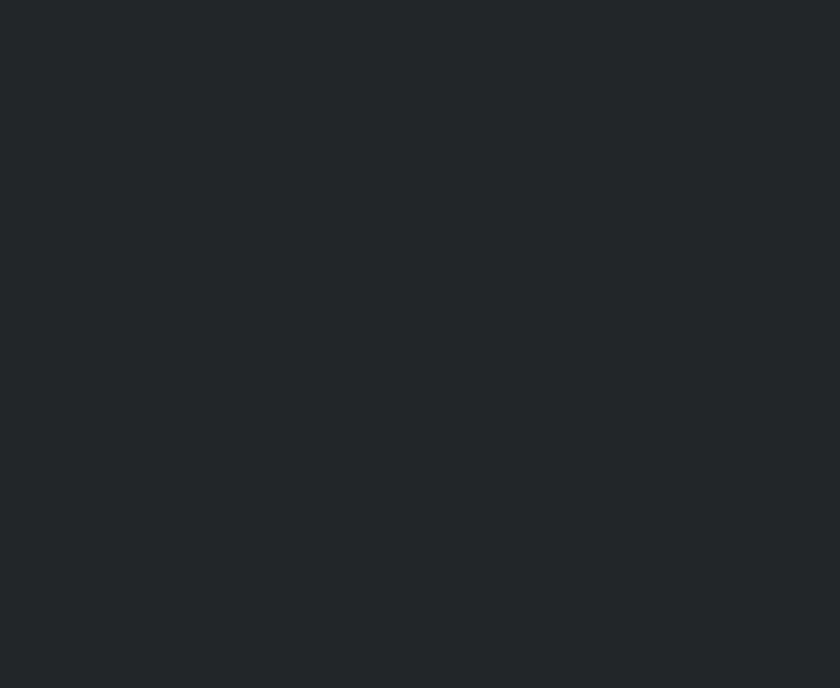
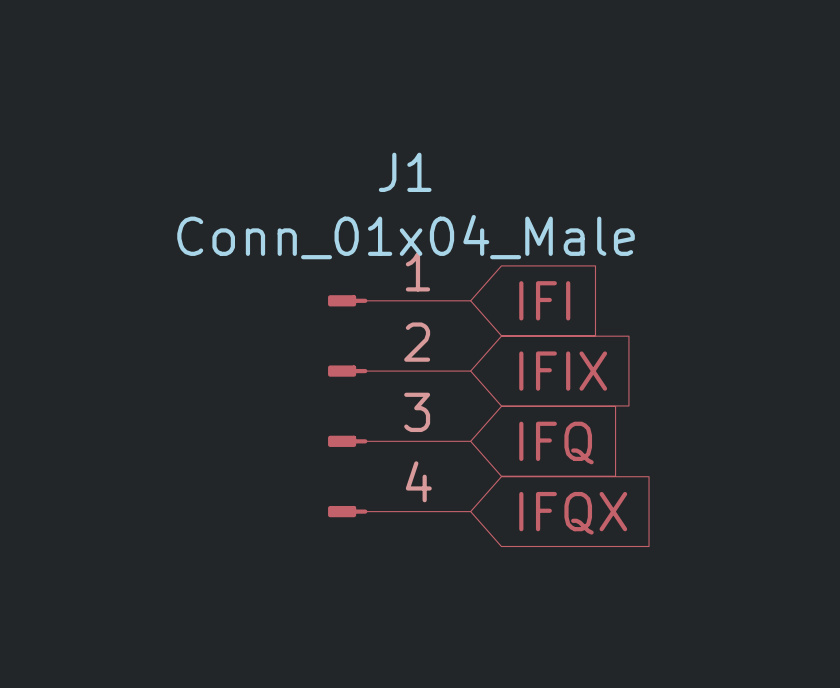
global label: none -> IFI (544, 300)
global label: none -> IFIX (563, 371)
J1: none -> Conn_01x04_Male (399, 406)
global label: none -> IFQ (556, 443)
global label: none -> IFQX (573, 513)

